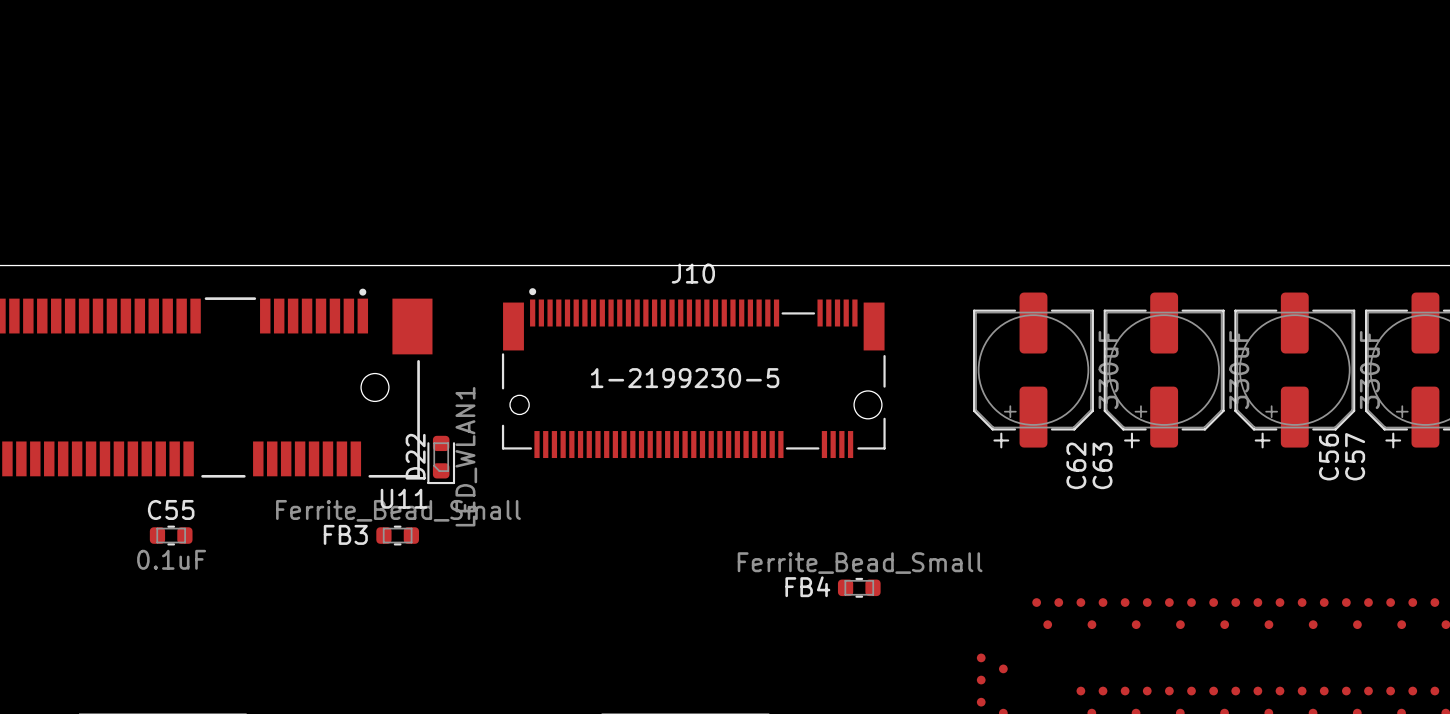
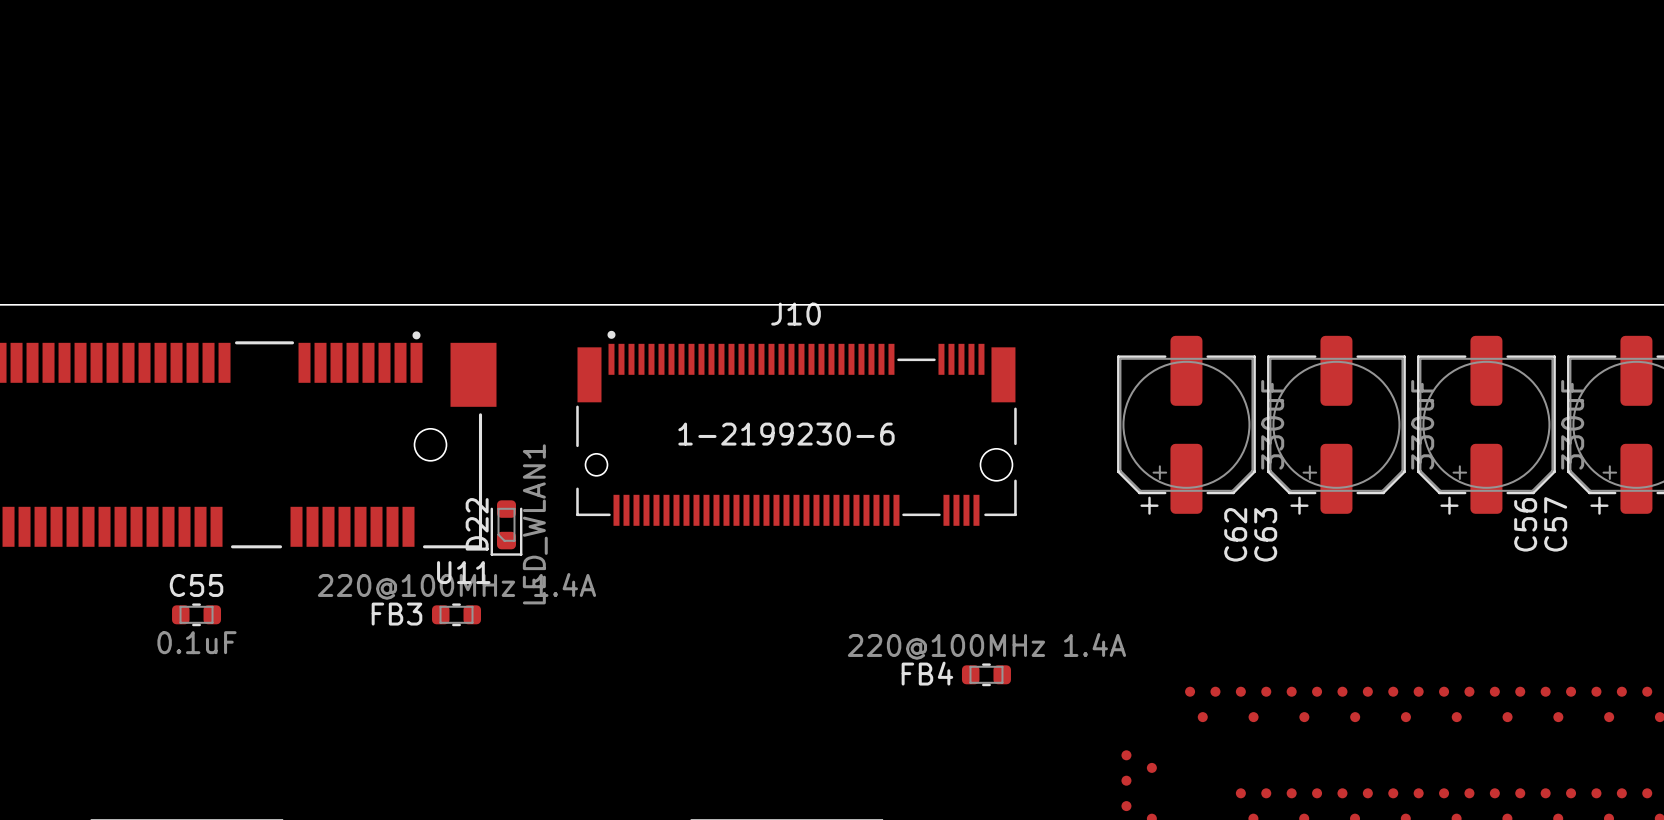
J10 value: 1-2199230-5 (685, 378) -> 1-2199230-6 (786, 434)
FB3 value: Ferrite_Bead_Small (398, 510) -> 220@100MHz 1.4A (456, 586)
FB4 value: Ferrite_Bead_Small (860, 563) -> 220@100MHz 1.4A (986, 646)

